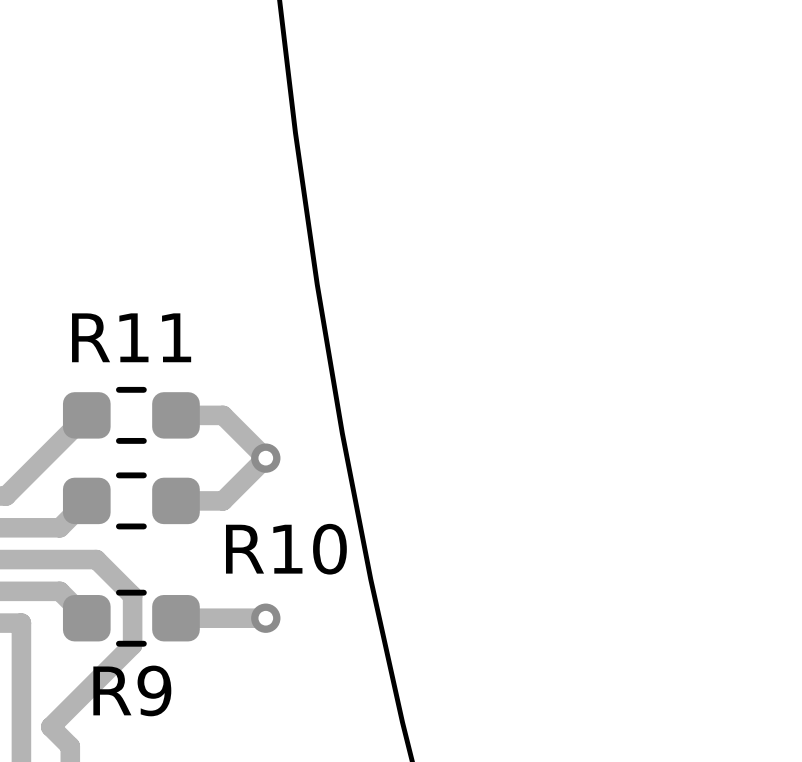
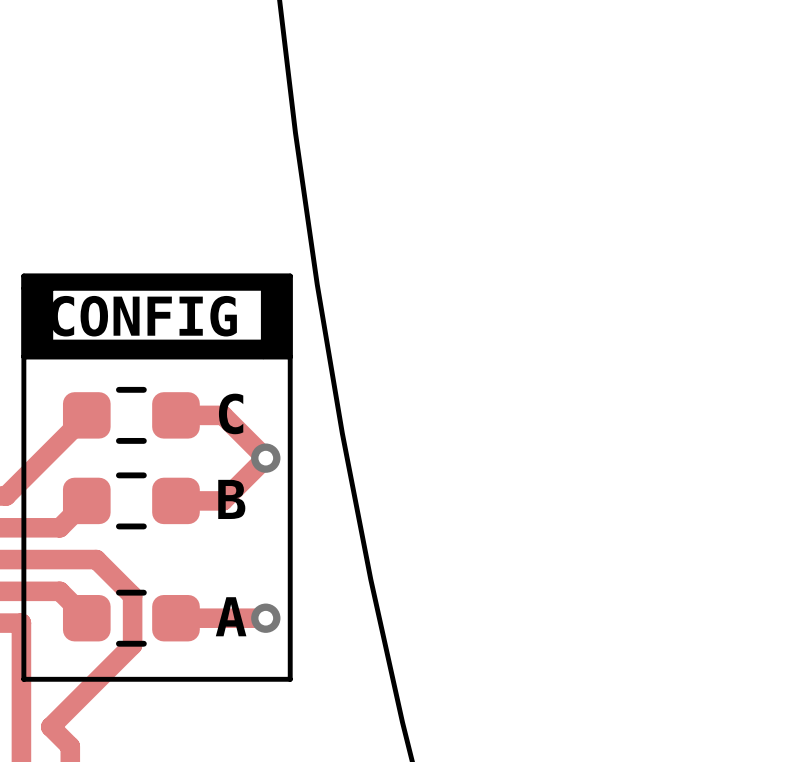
drawing: none -> [21, 273, 293, 360]
line: none -> (23, 276) (290, 276) (290, 679) (23, 679) (23, 276)
text: none -> CONFIG (143, 316)
R11 name: R11 (131, 337) -> none
text: none -> C (231, 413)
text: none -> B (231, 499)
R10 name: R10 (286, 549) -> none
text: none -> A (231, 616)
R9 name: R9 (132, 690) -> none

